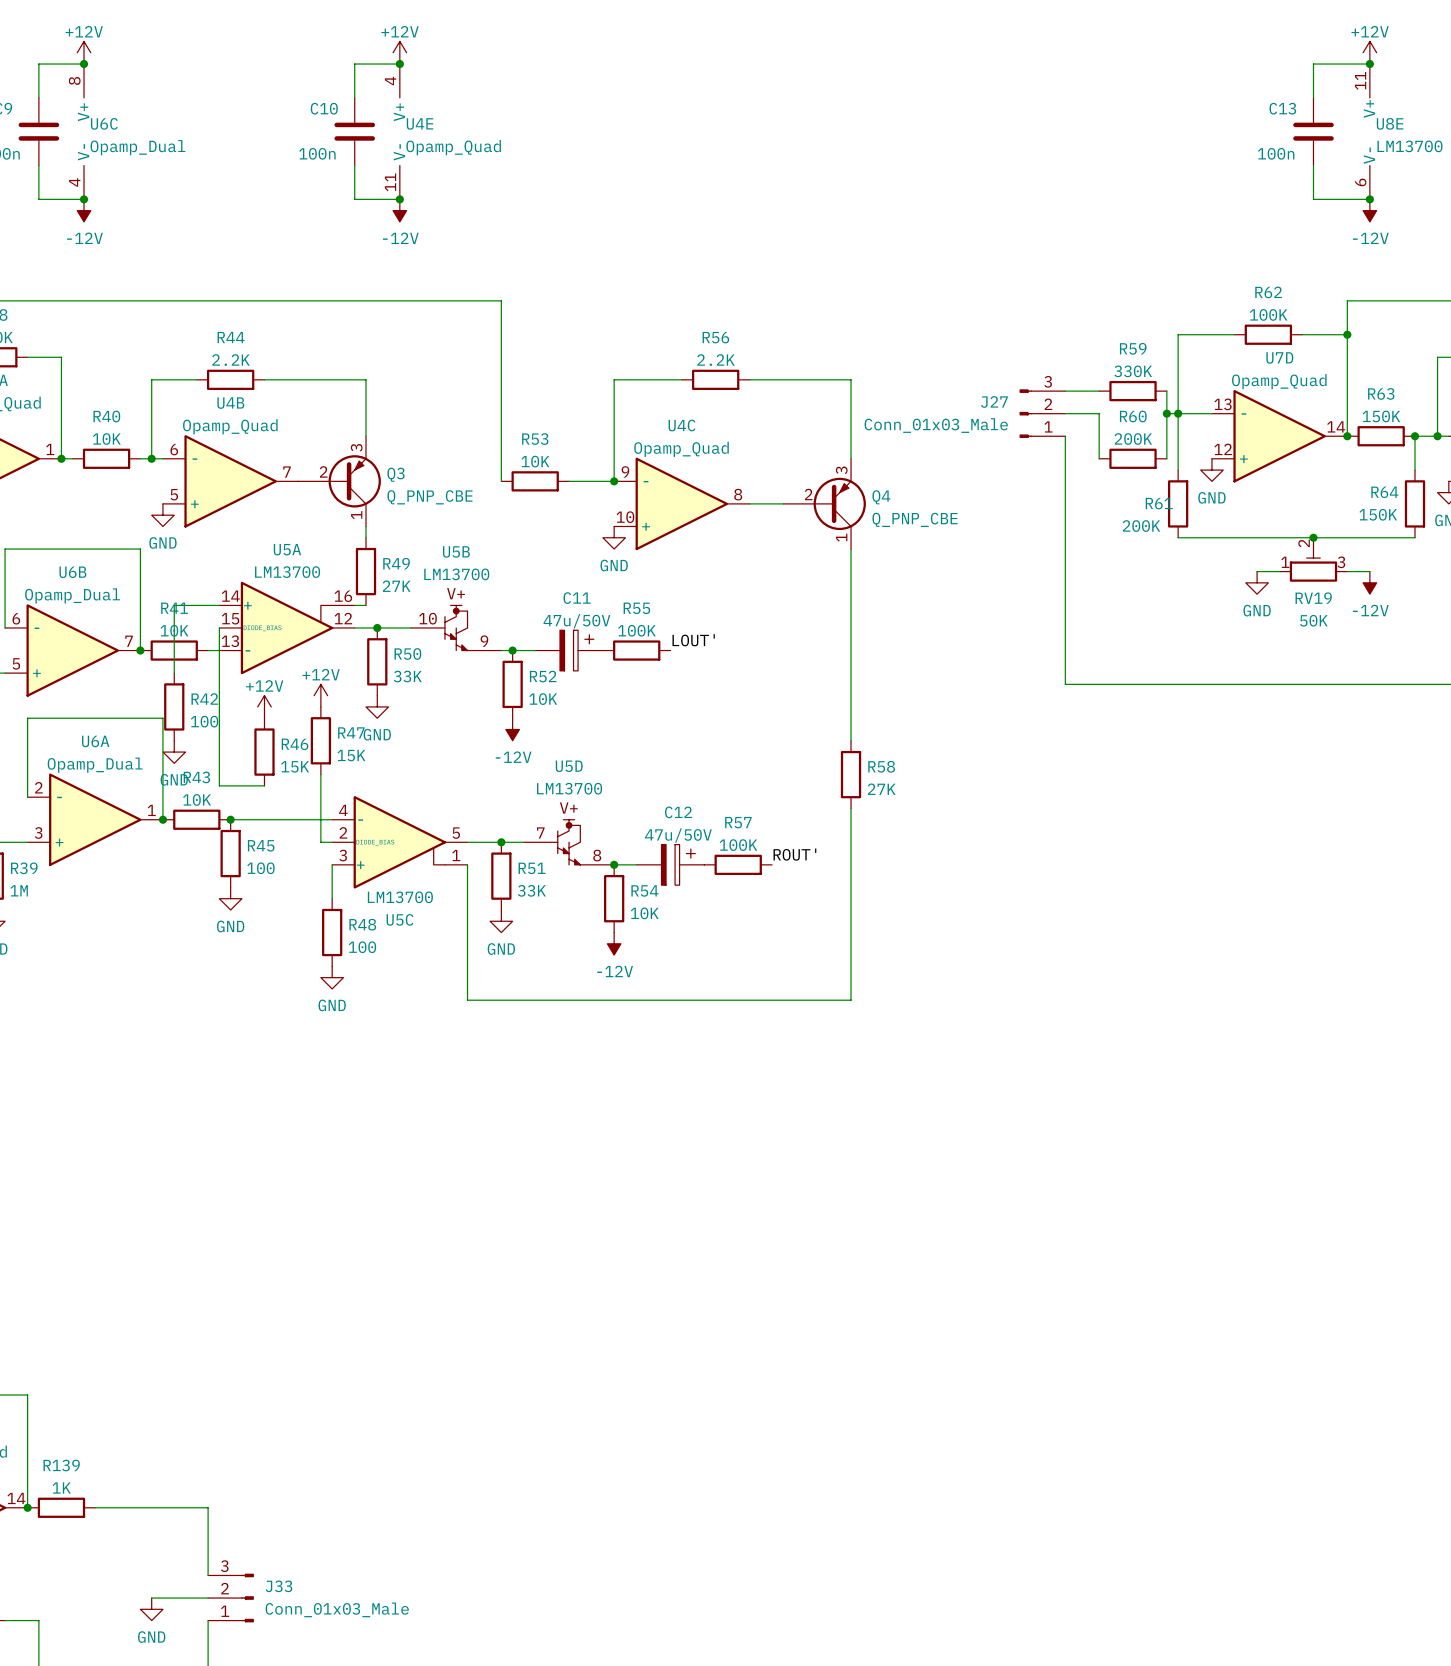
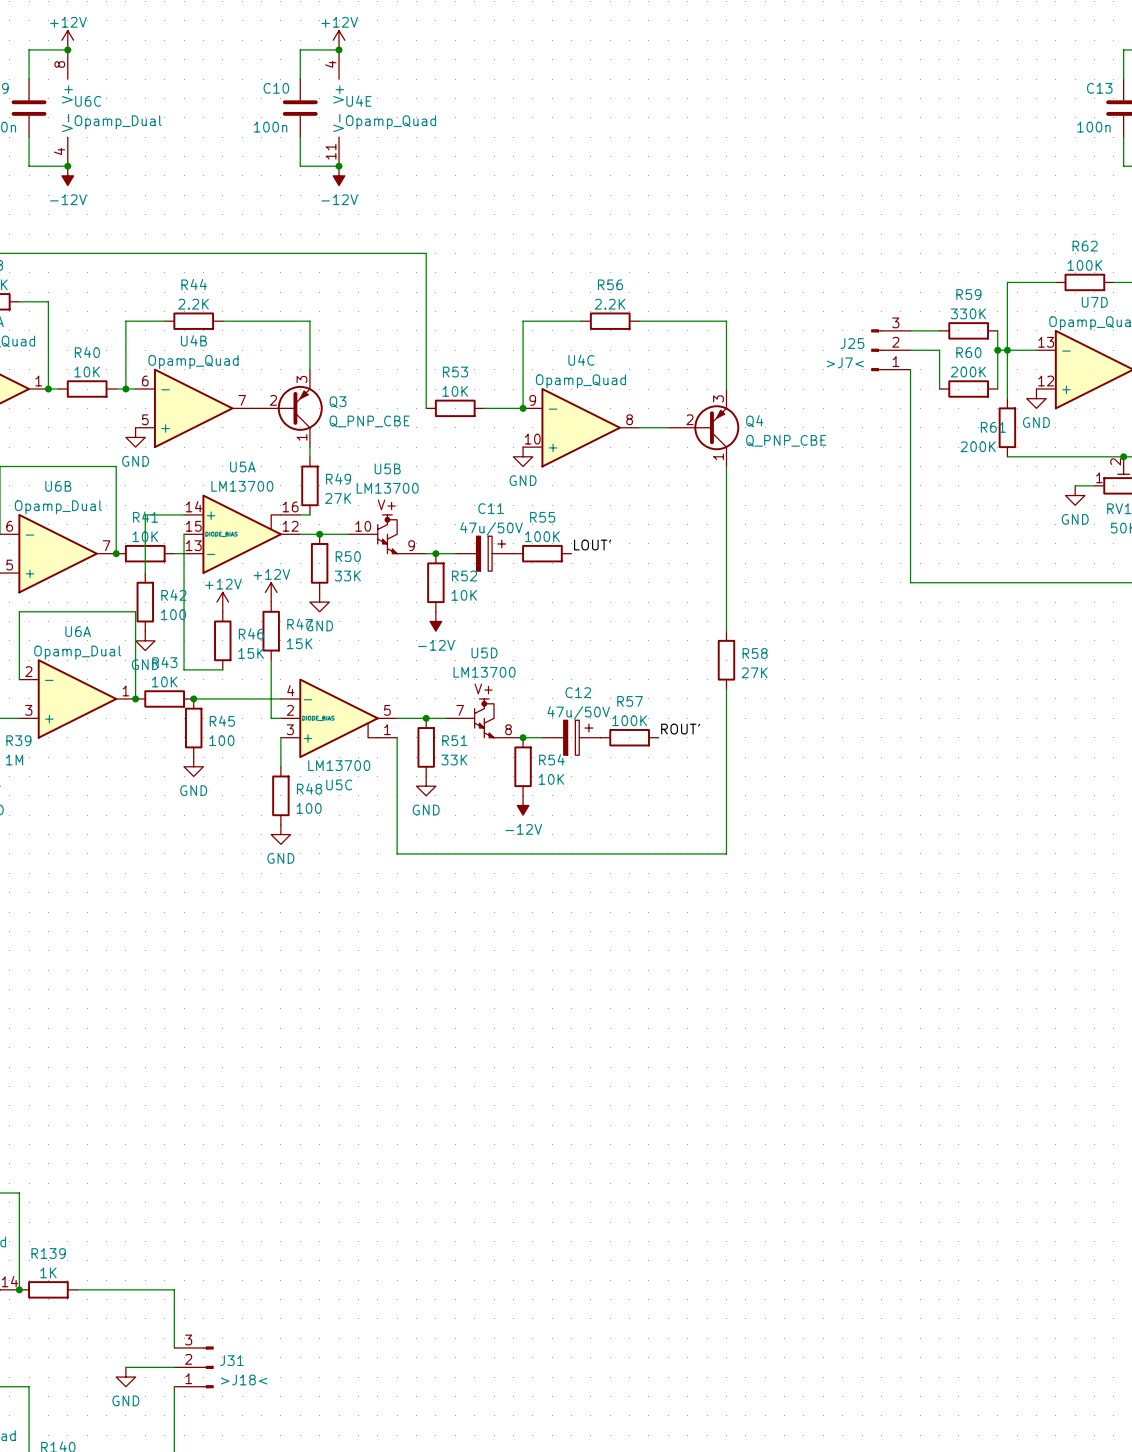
J27 name: J27 (994, 401) -> J25 (852, 343)
J27 value: Conn_01x03_Male (936, 425) -> >J7< (845, 362)
J33 name: J33 (278, 1586) -> J31 (231, 1360)
J33 value: Conn_01x03_Male (337, 1609) -> >J18< (244, 1379)

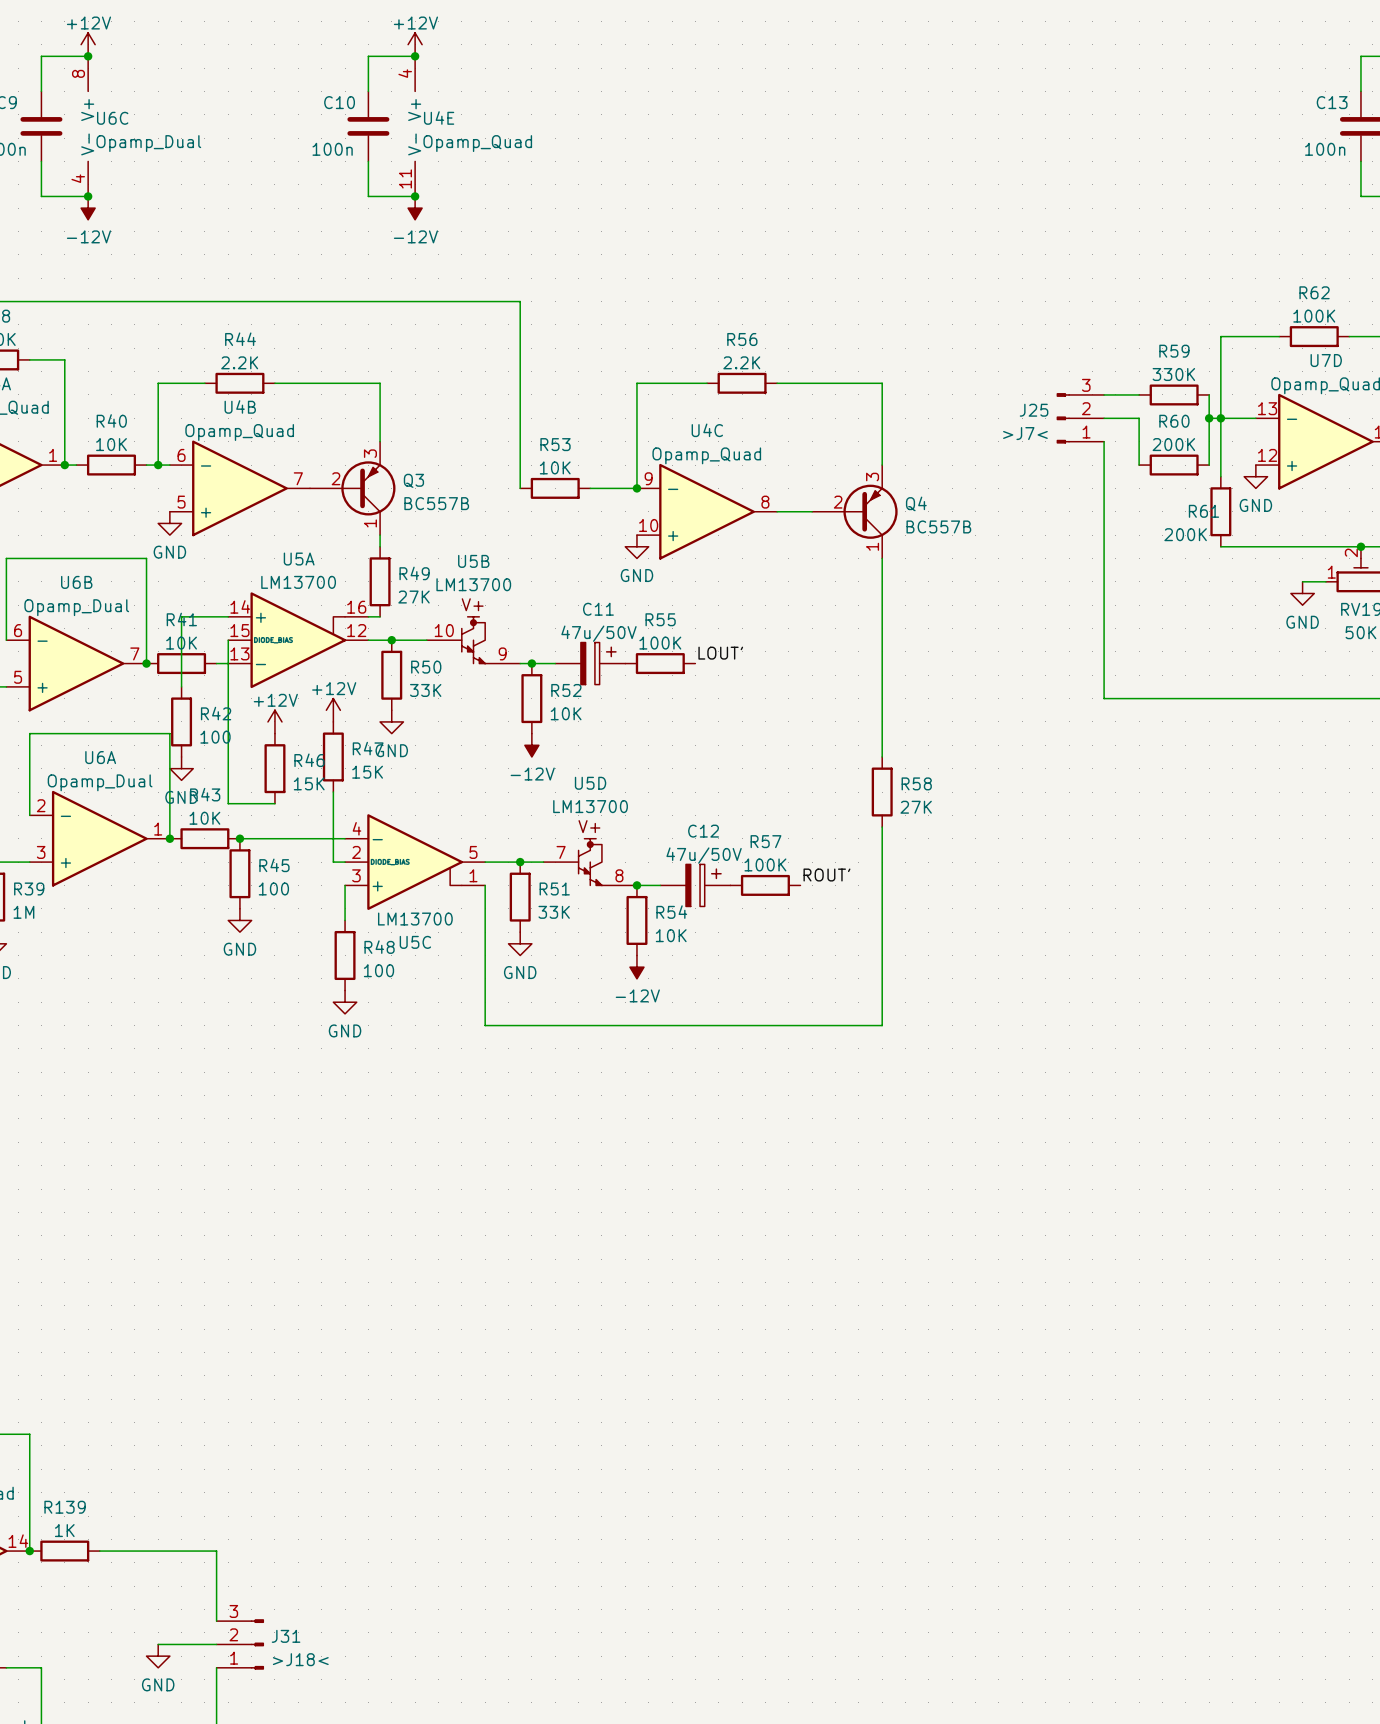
Q3 value: Q_PNP_CBE (369, 421) -> BC557B (436, 503)
Q4 value: Q_PNP_CBE (786, 440) -> BC557B (938, 526)

